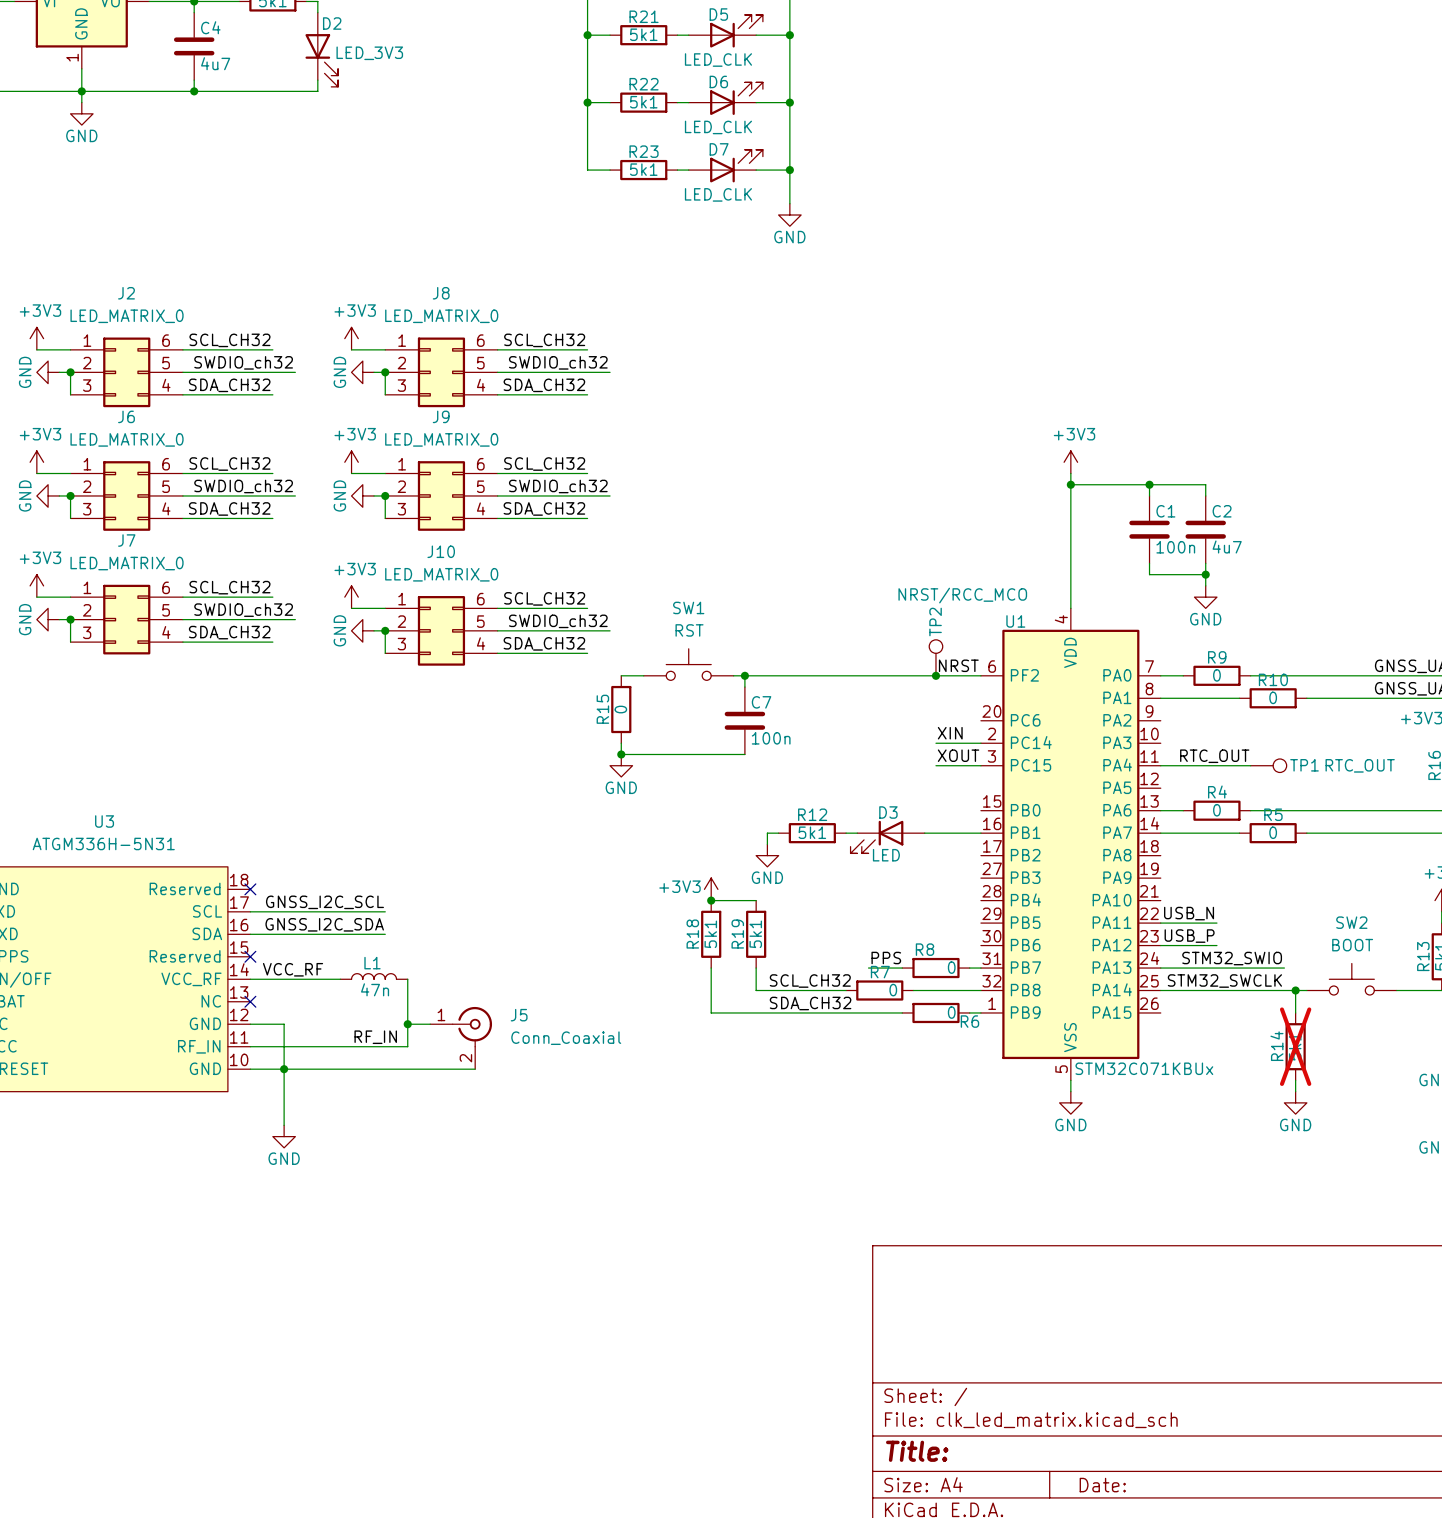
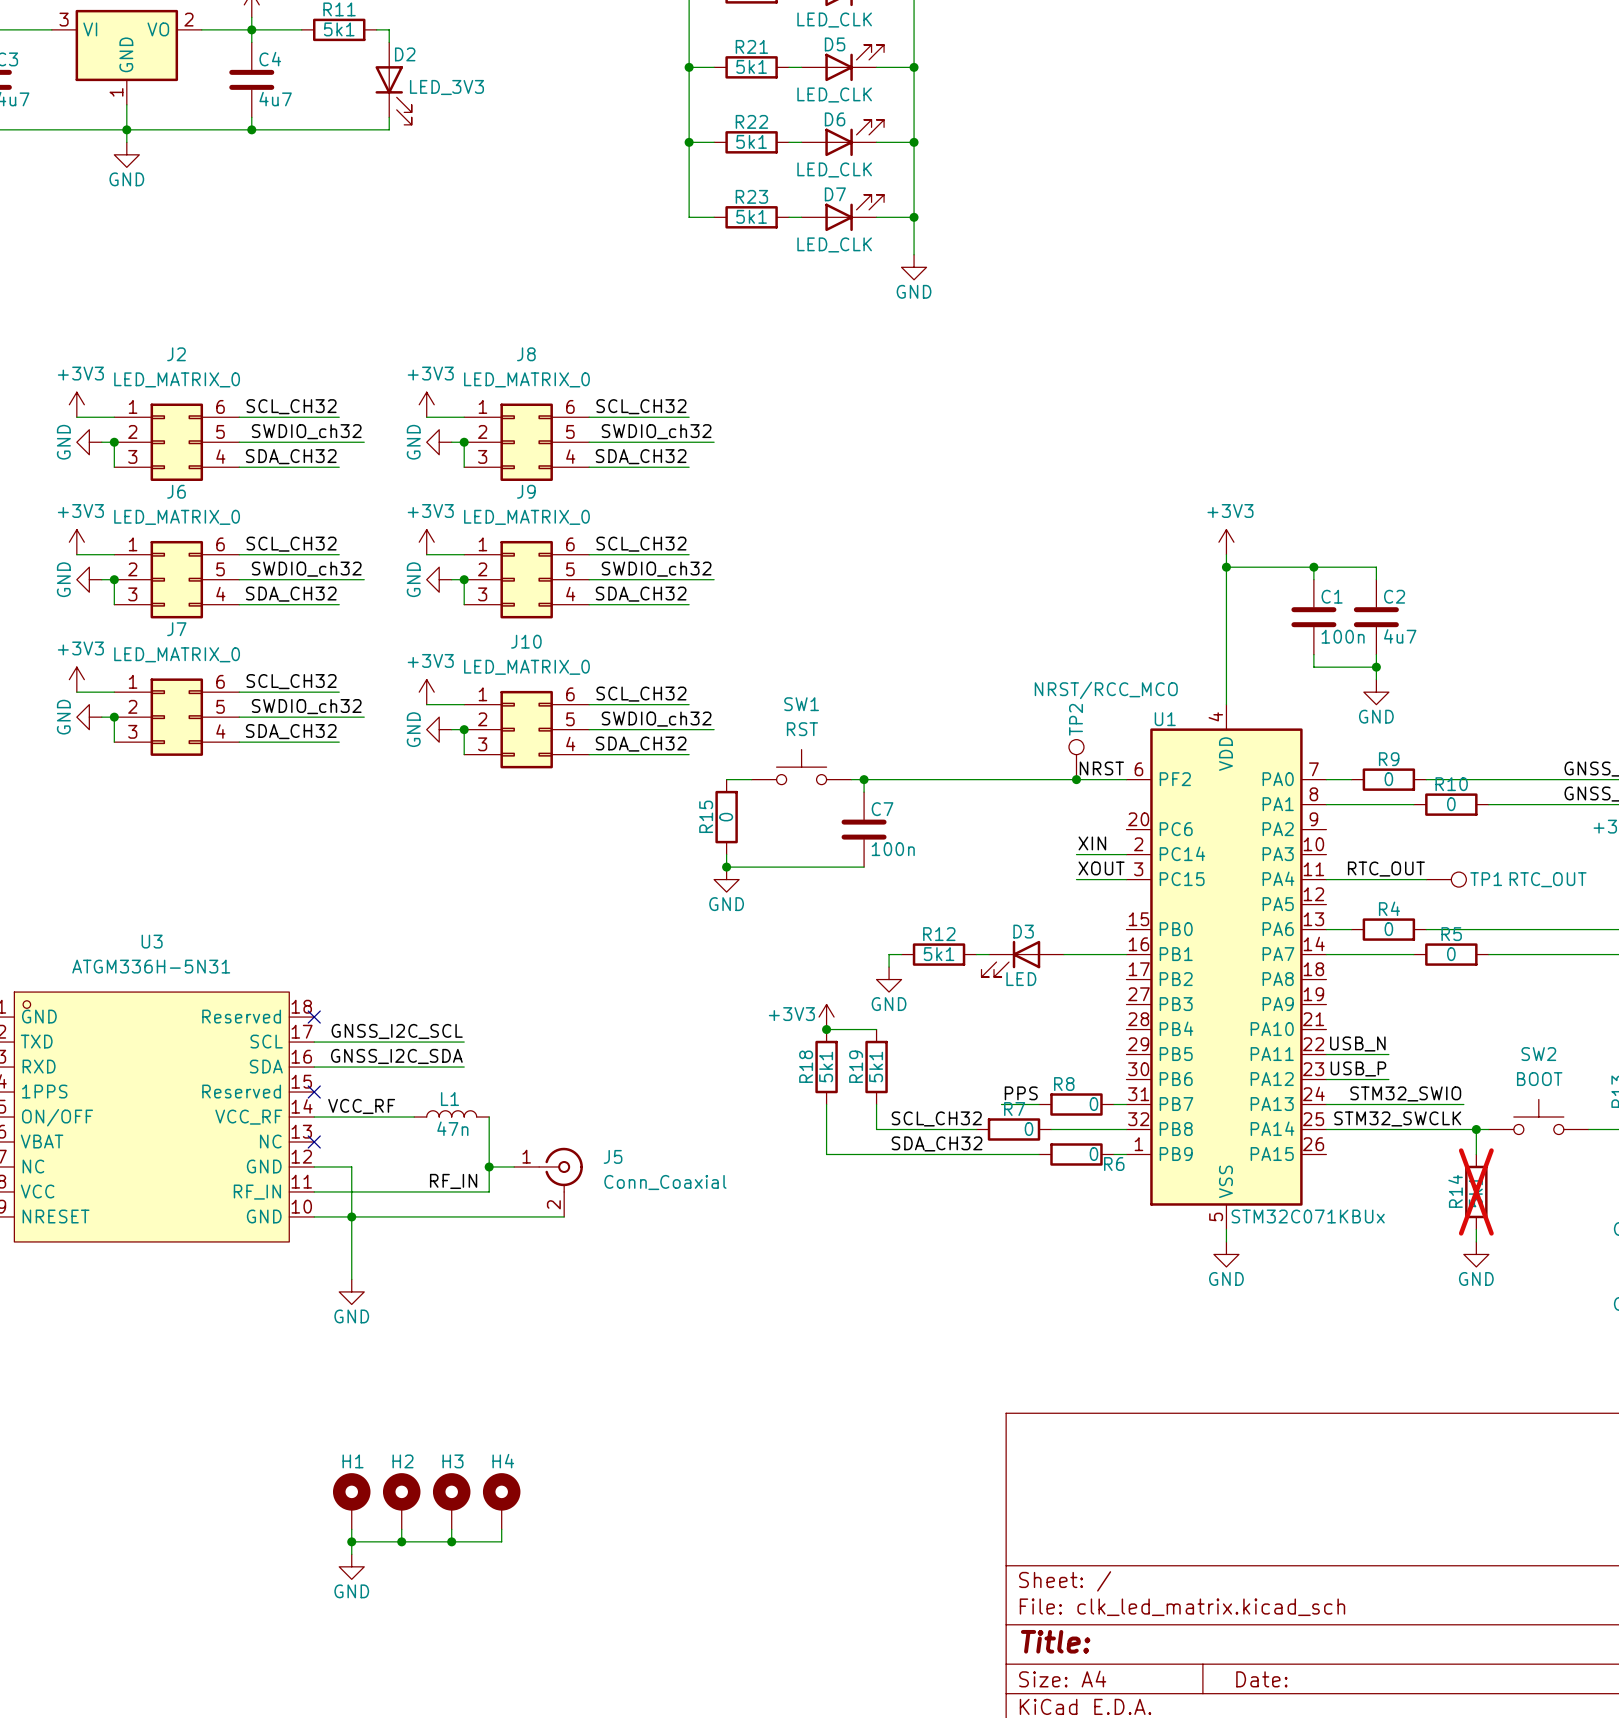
H1: none -> (351, 1501)
H2: none -> (401, 1501)
H3: none -> (451, 1501)
H4: none -> (501, 1501)
wire: none -> (351, 1529) (351, 1554)
wire: none -> (401, 1529) (401, 1541)
wire: none -> (451, 1529) (451, 1541)
wire: none -> (501, 1529) (501, 1541) (351, 1541)
junction: none -> (351, 1541)
junction: none -> (401, 1541)
junction: none -> (451, 1541)
power symbol: none -> GND (351, 1566)

